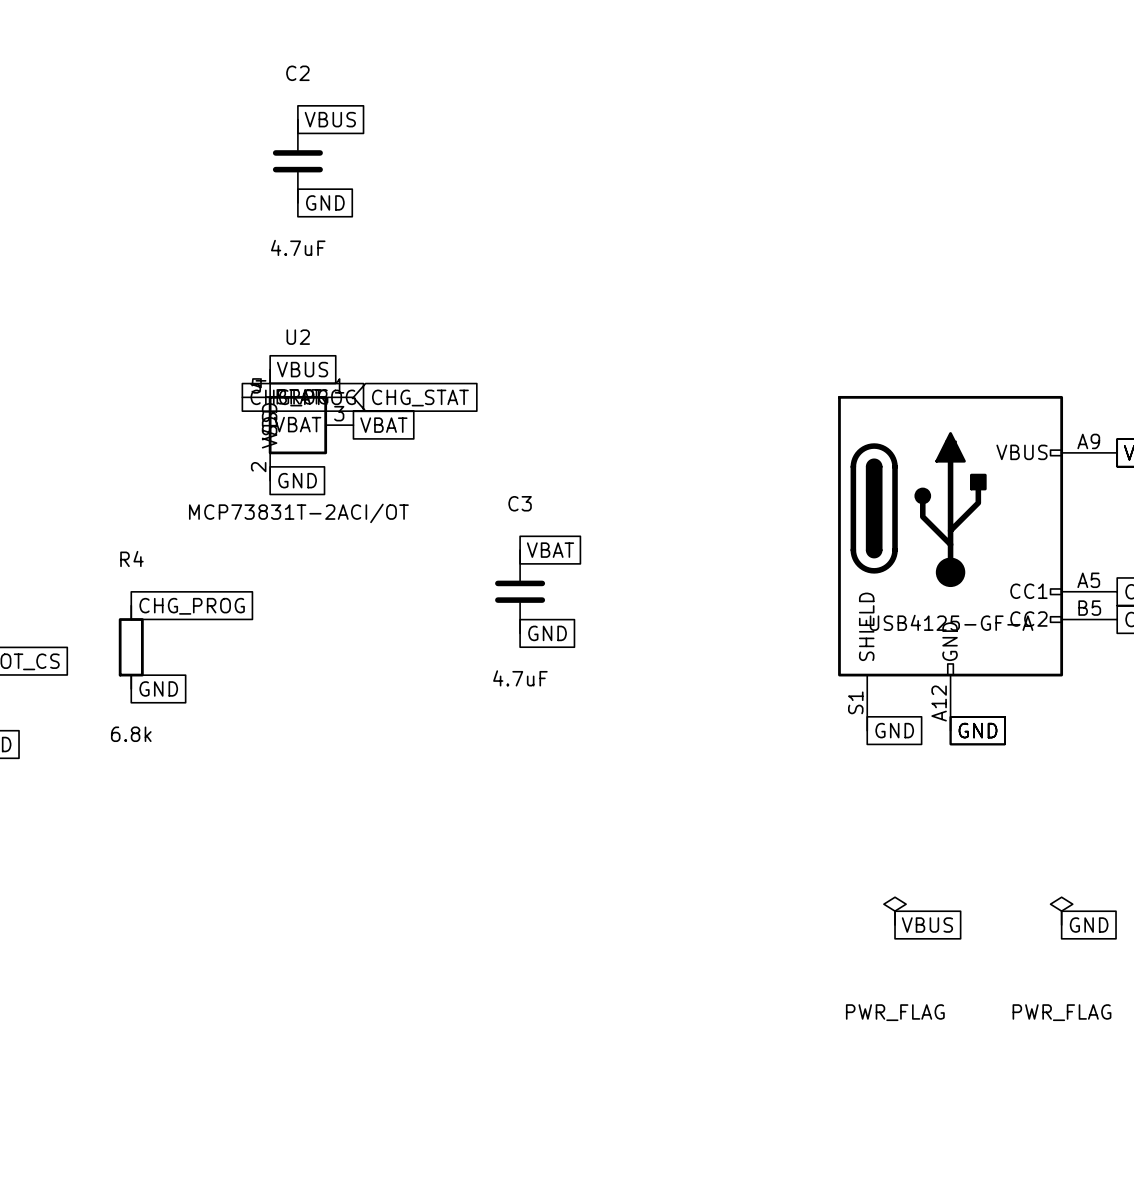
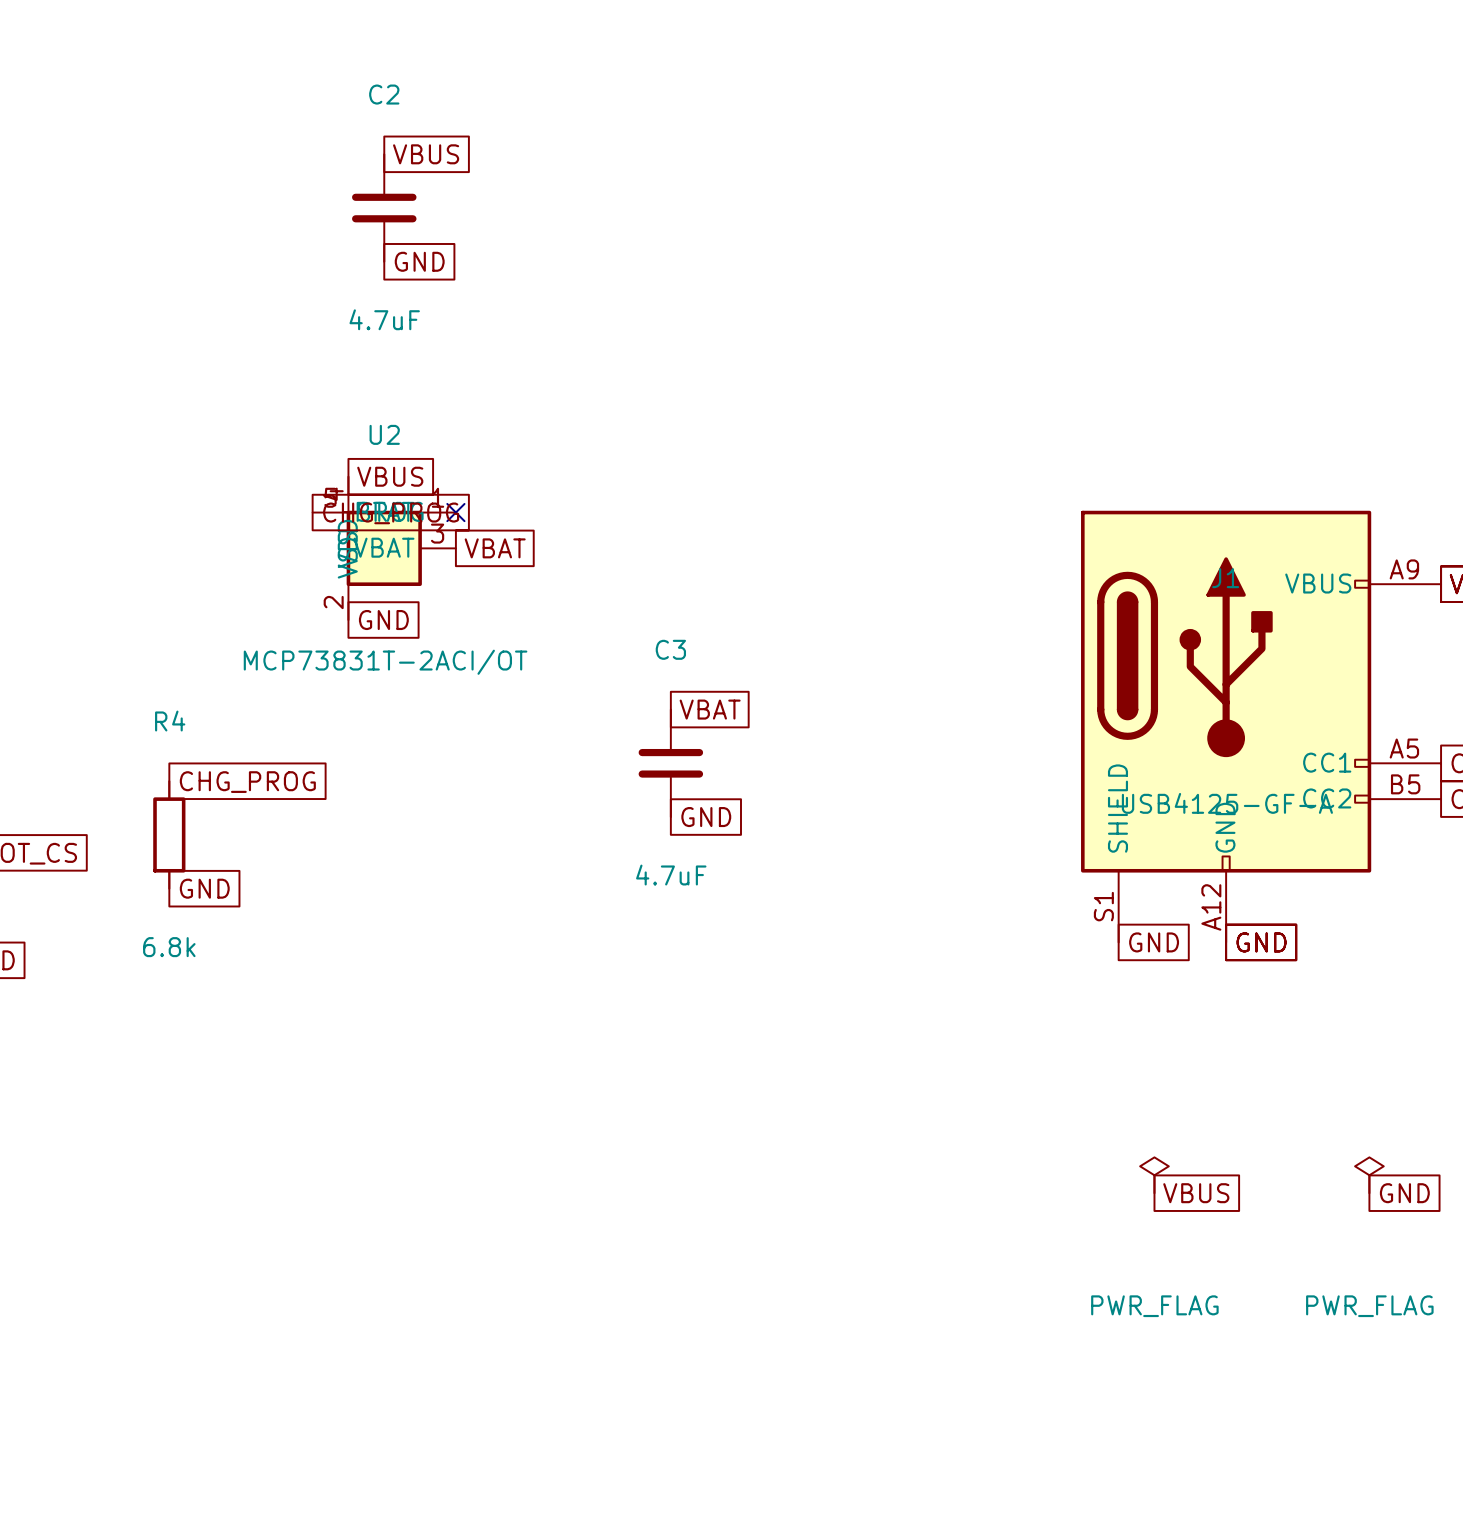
no-connect mark: none -> (455, 512)
global label: CHG_STAT (420, 398) -> none

